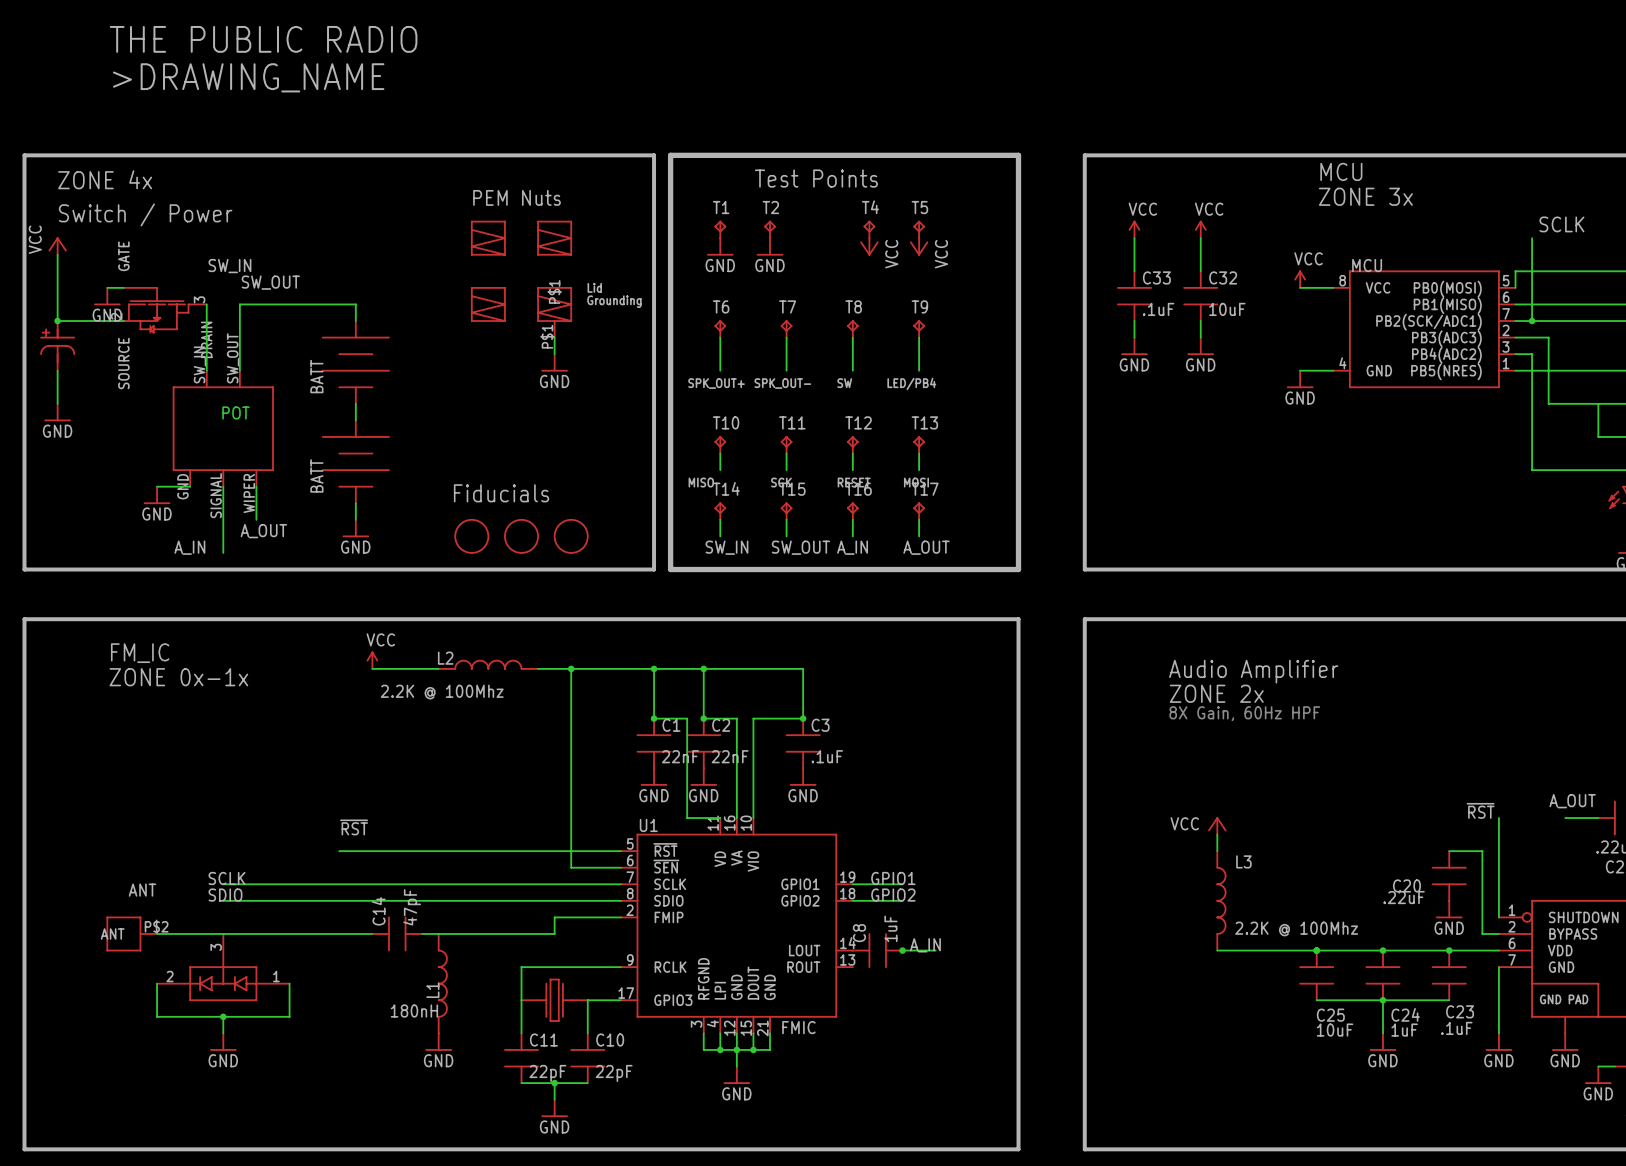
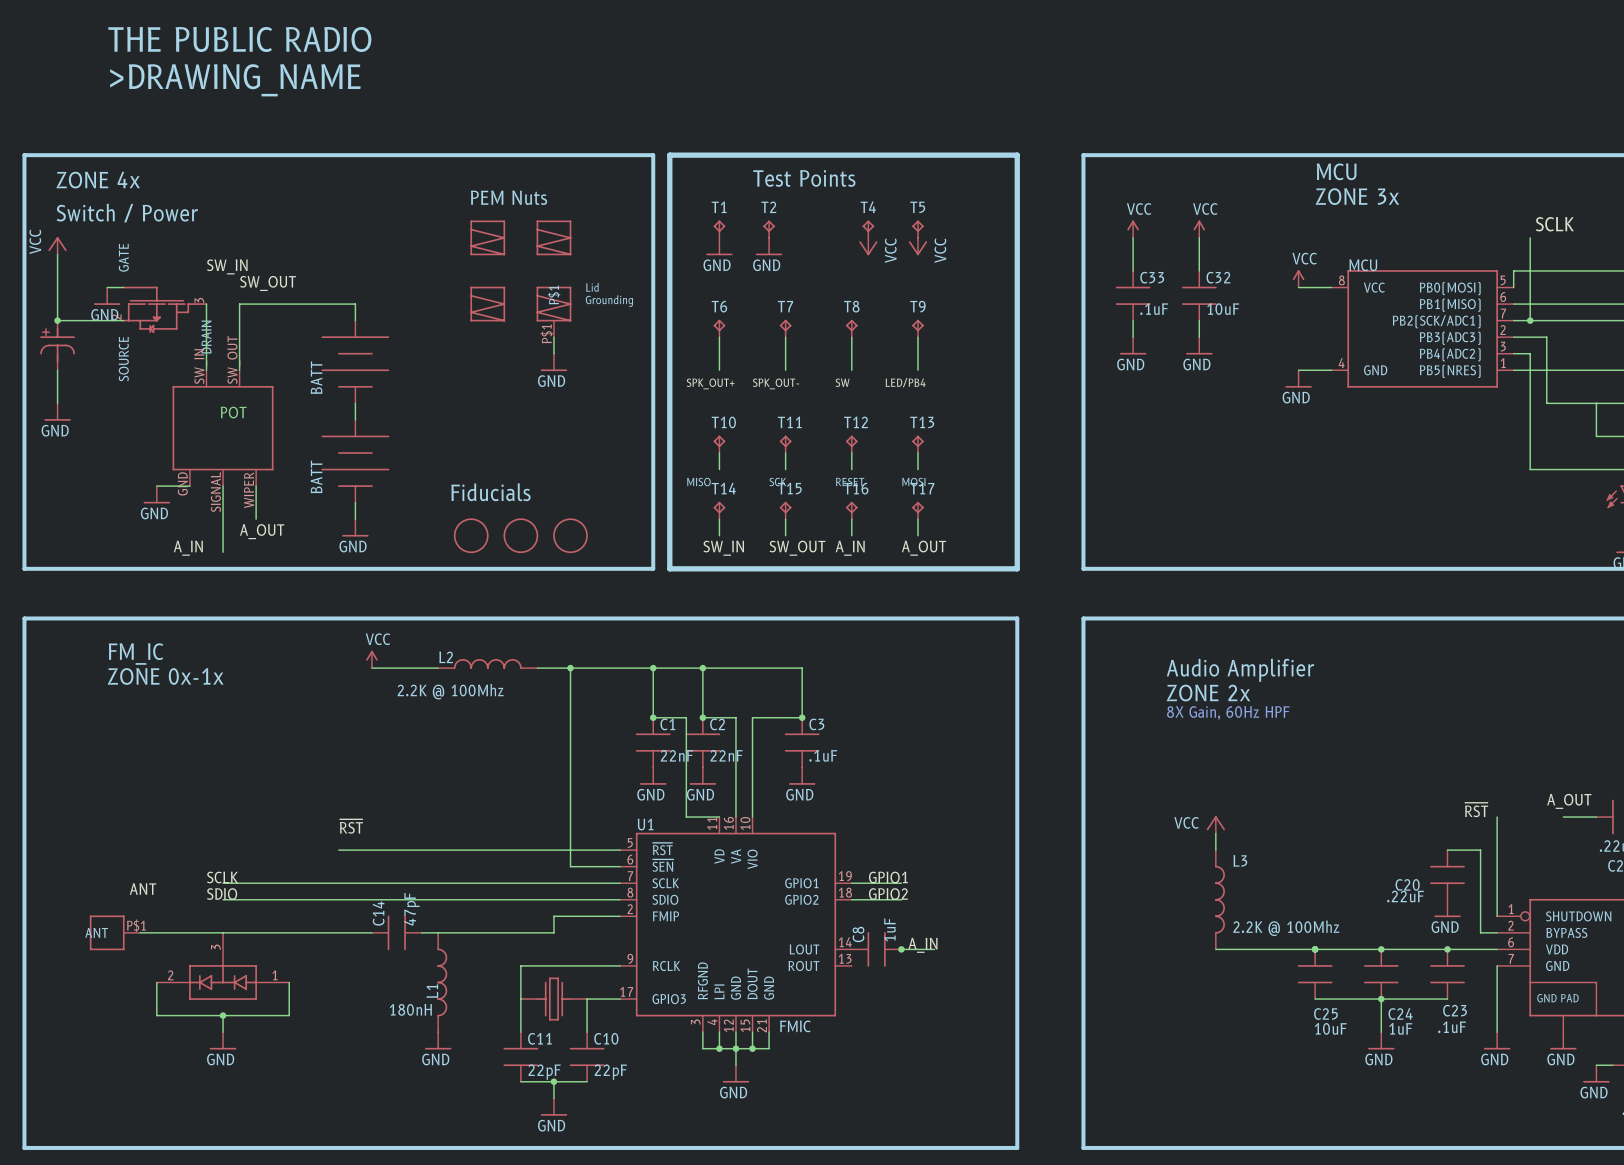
part: none -> (115, 932)
part: (131, 933) -> none

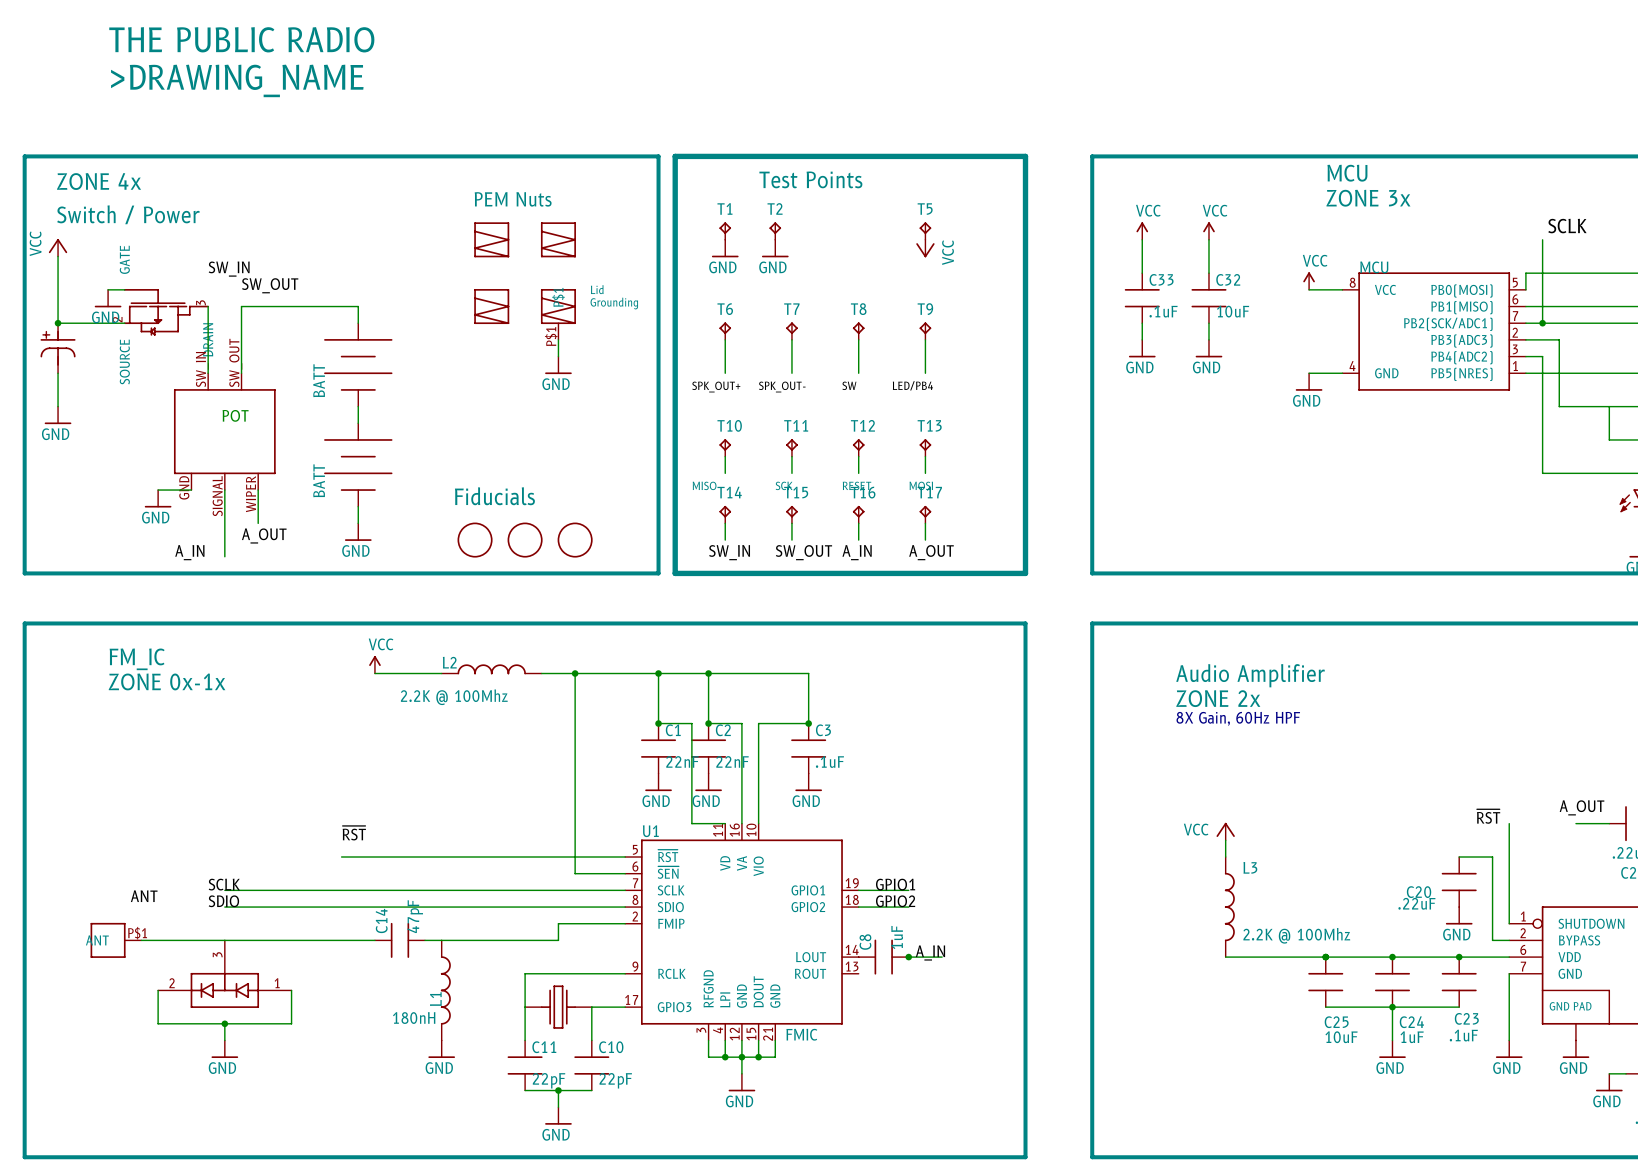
T4: (868, 229) -> none
power symbol: VCC (868, 246) -> none

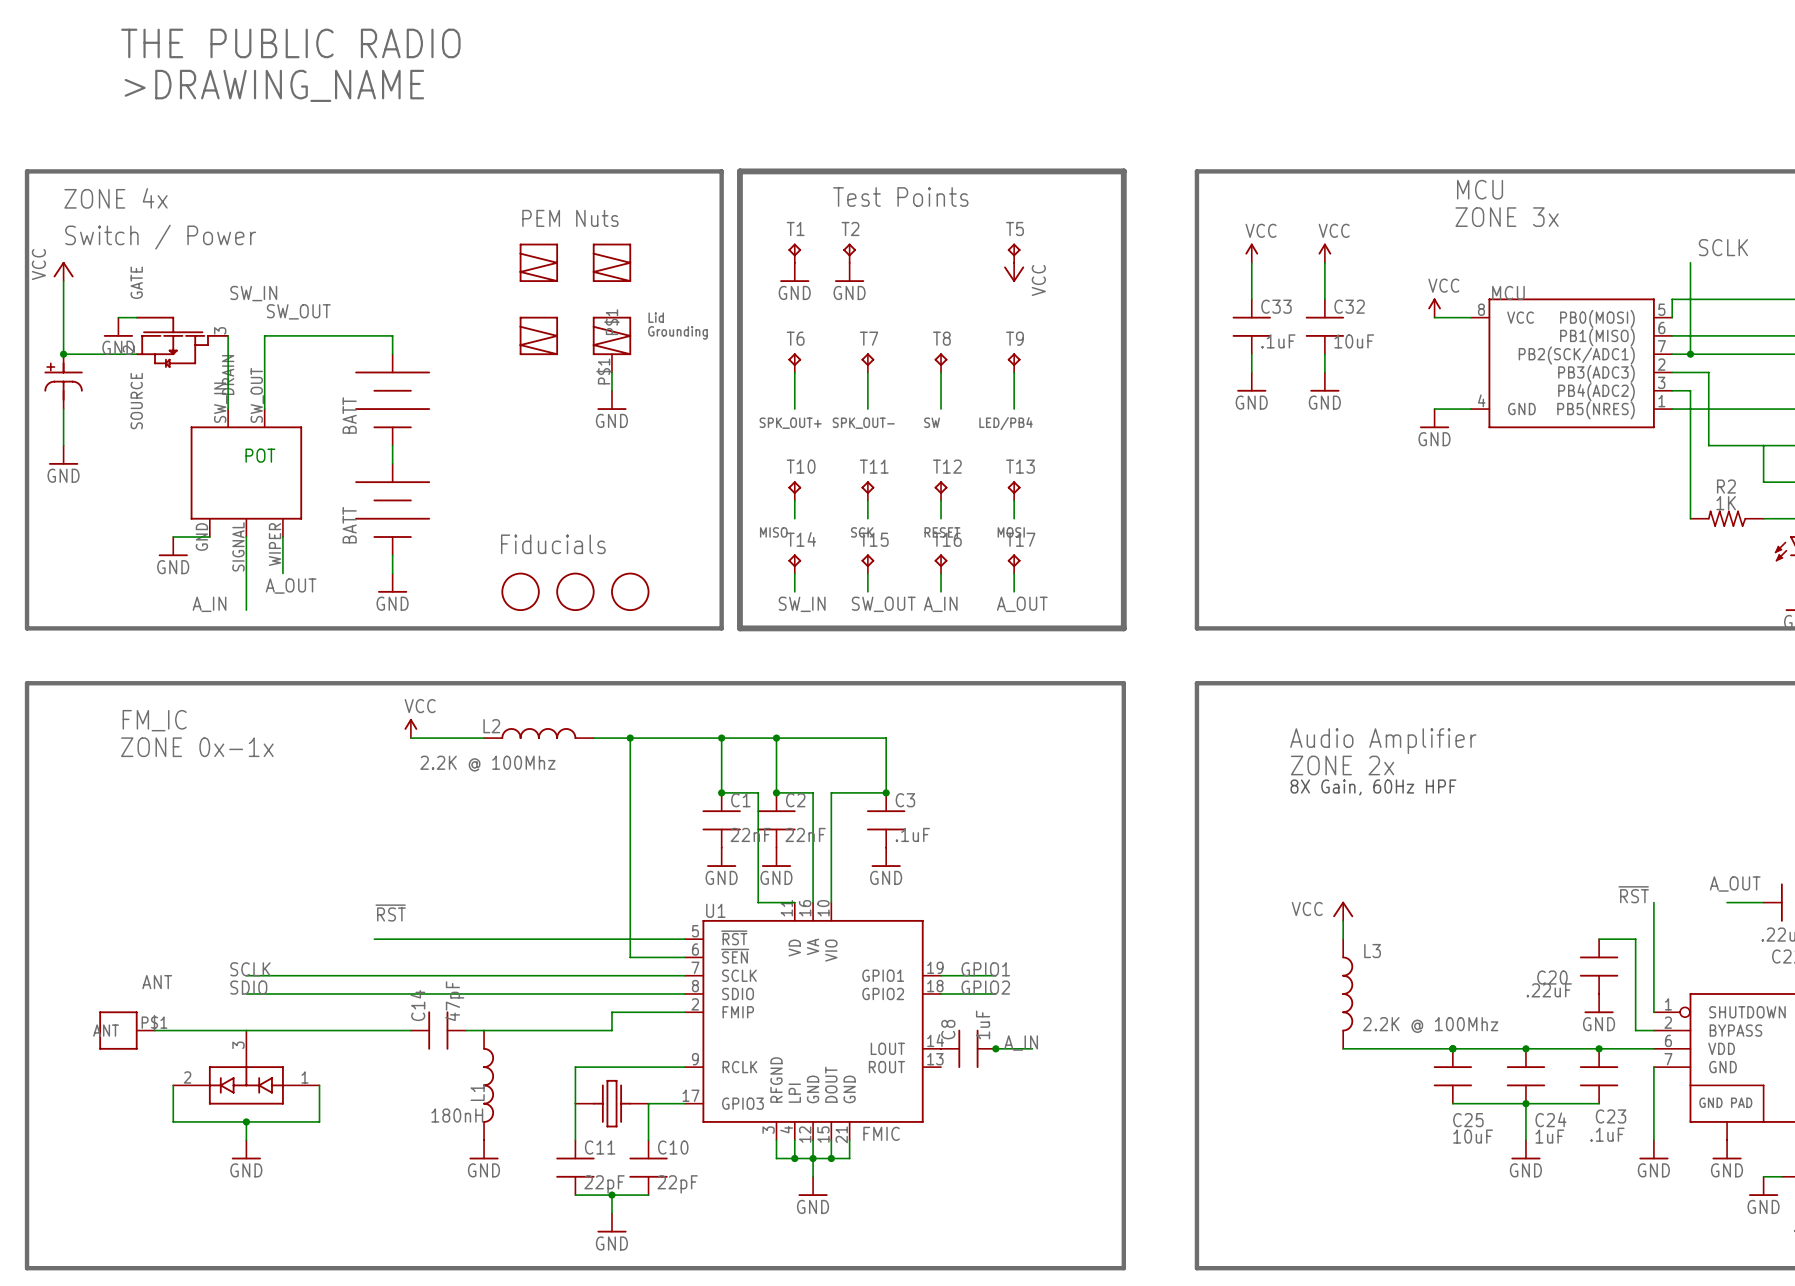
R2: none -> 1K (1727, 518)

